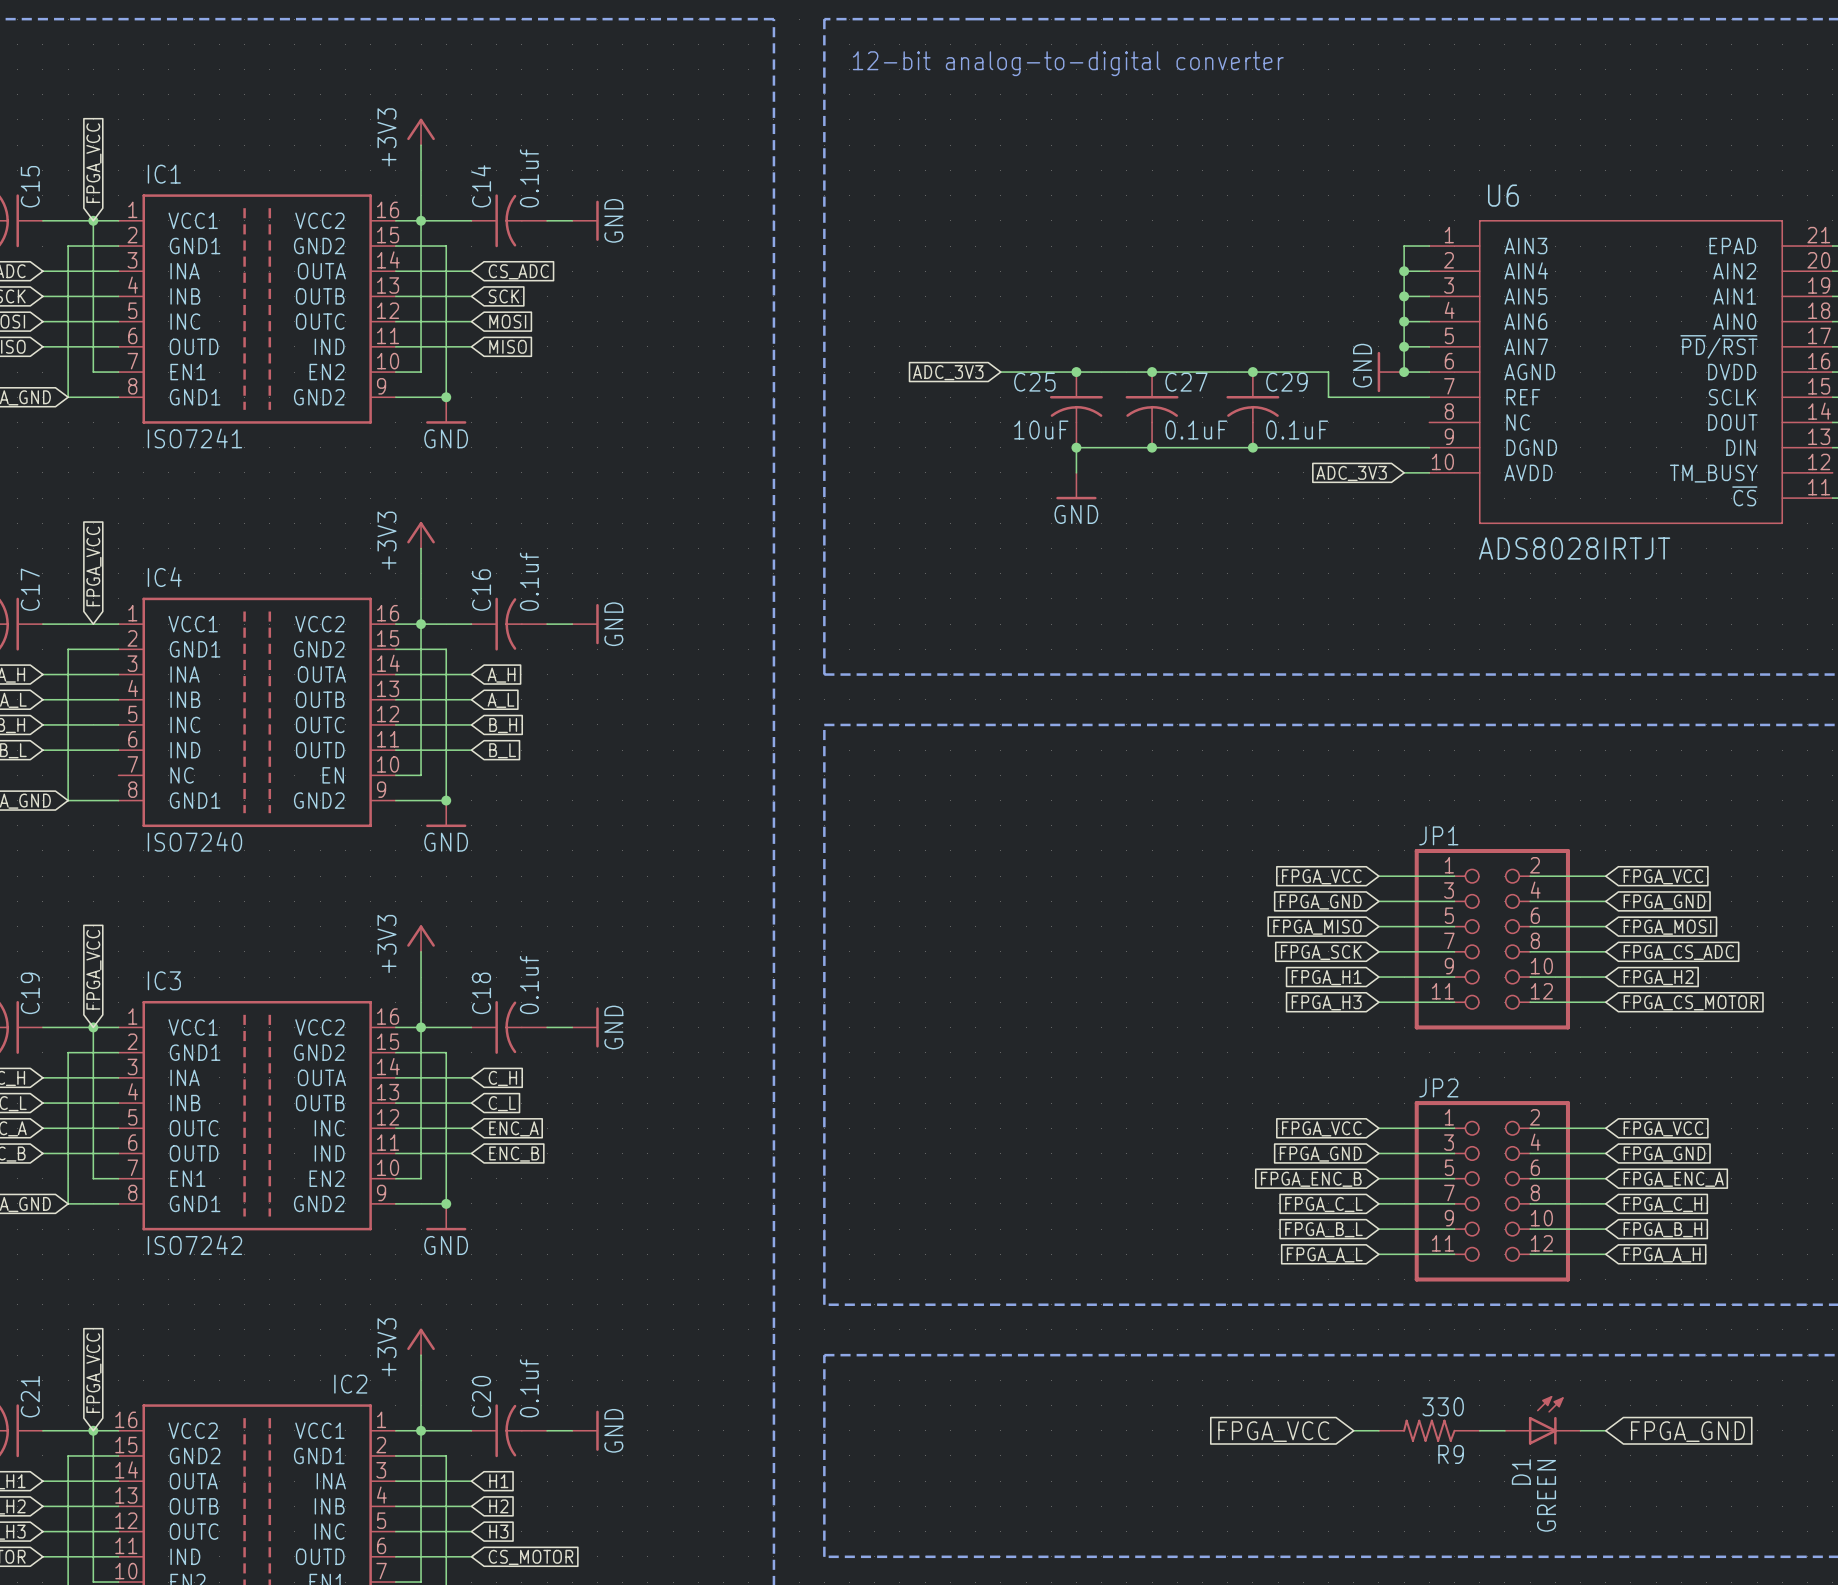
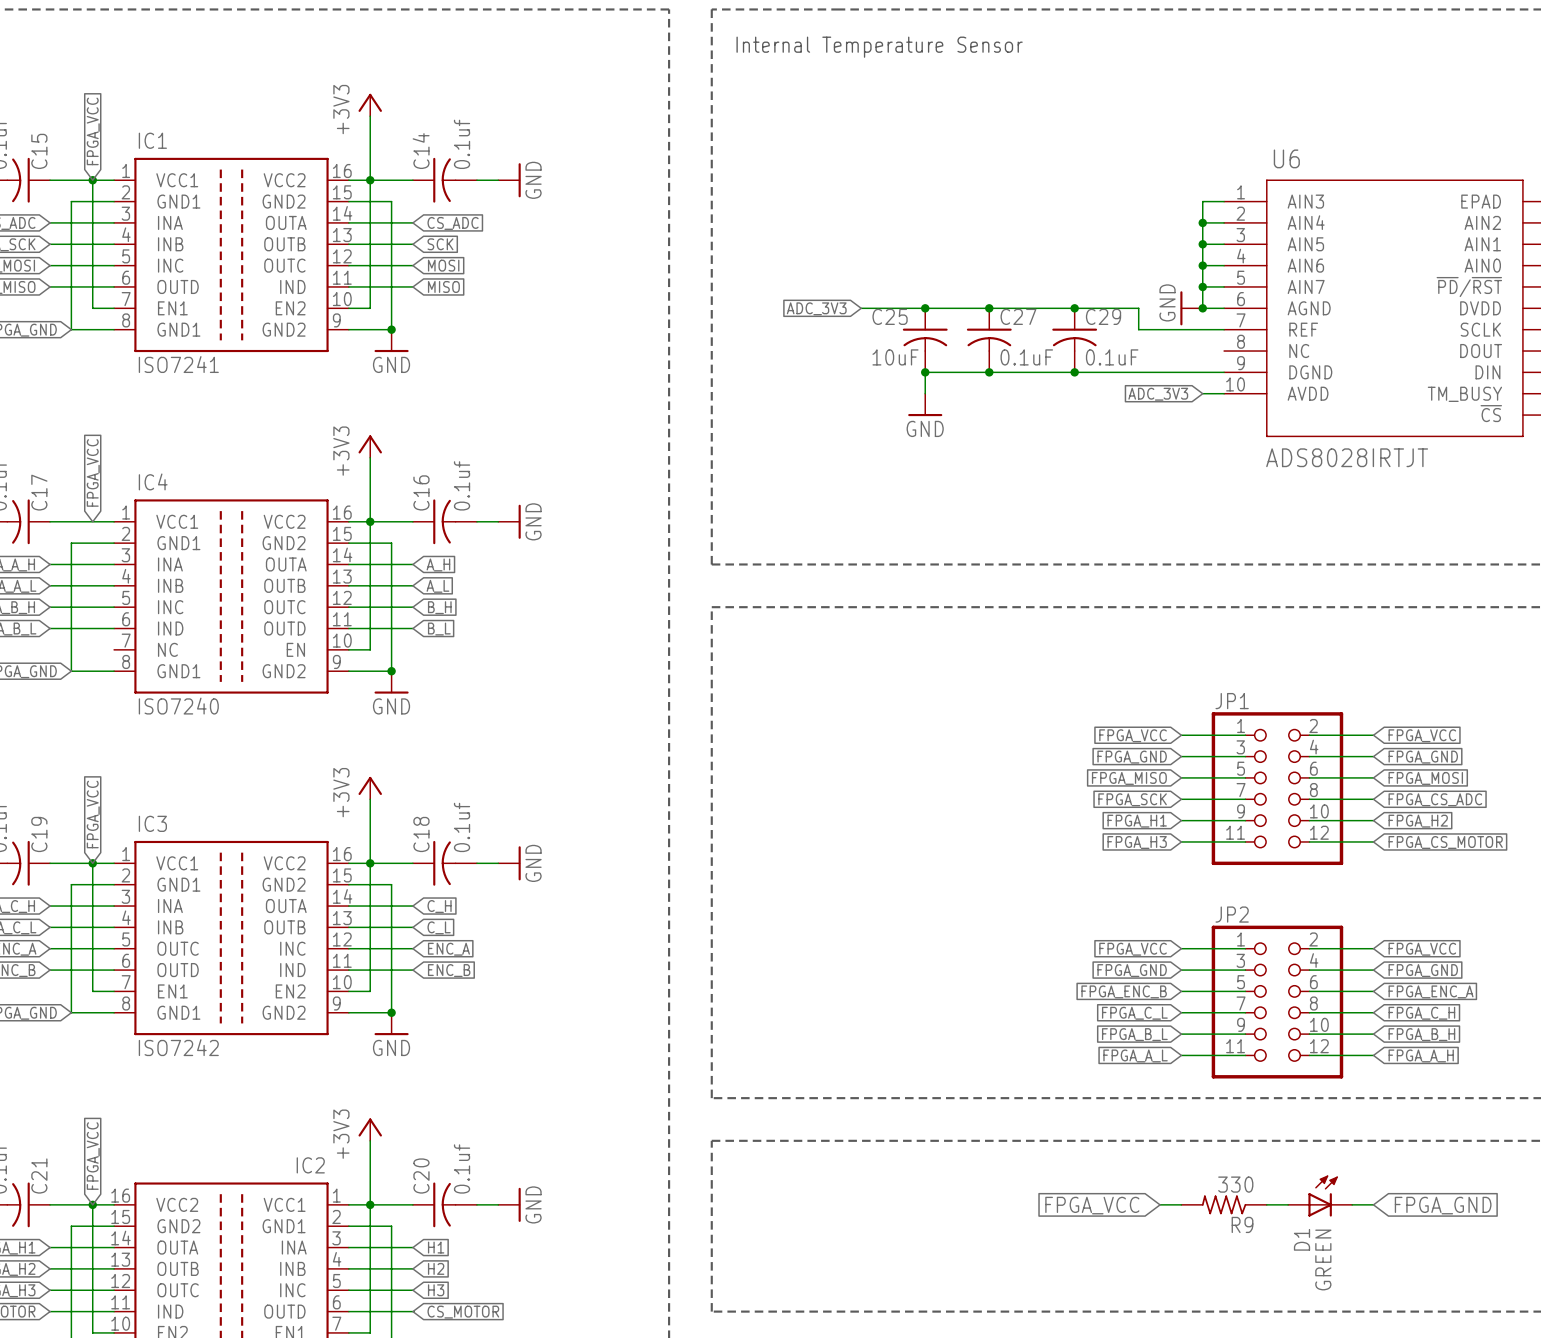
text: 12-bit analog-to-digital converter (1068, 63) -> Internal Temperature Sensor (879, 47)

